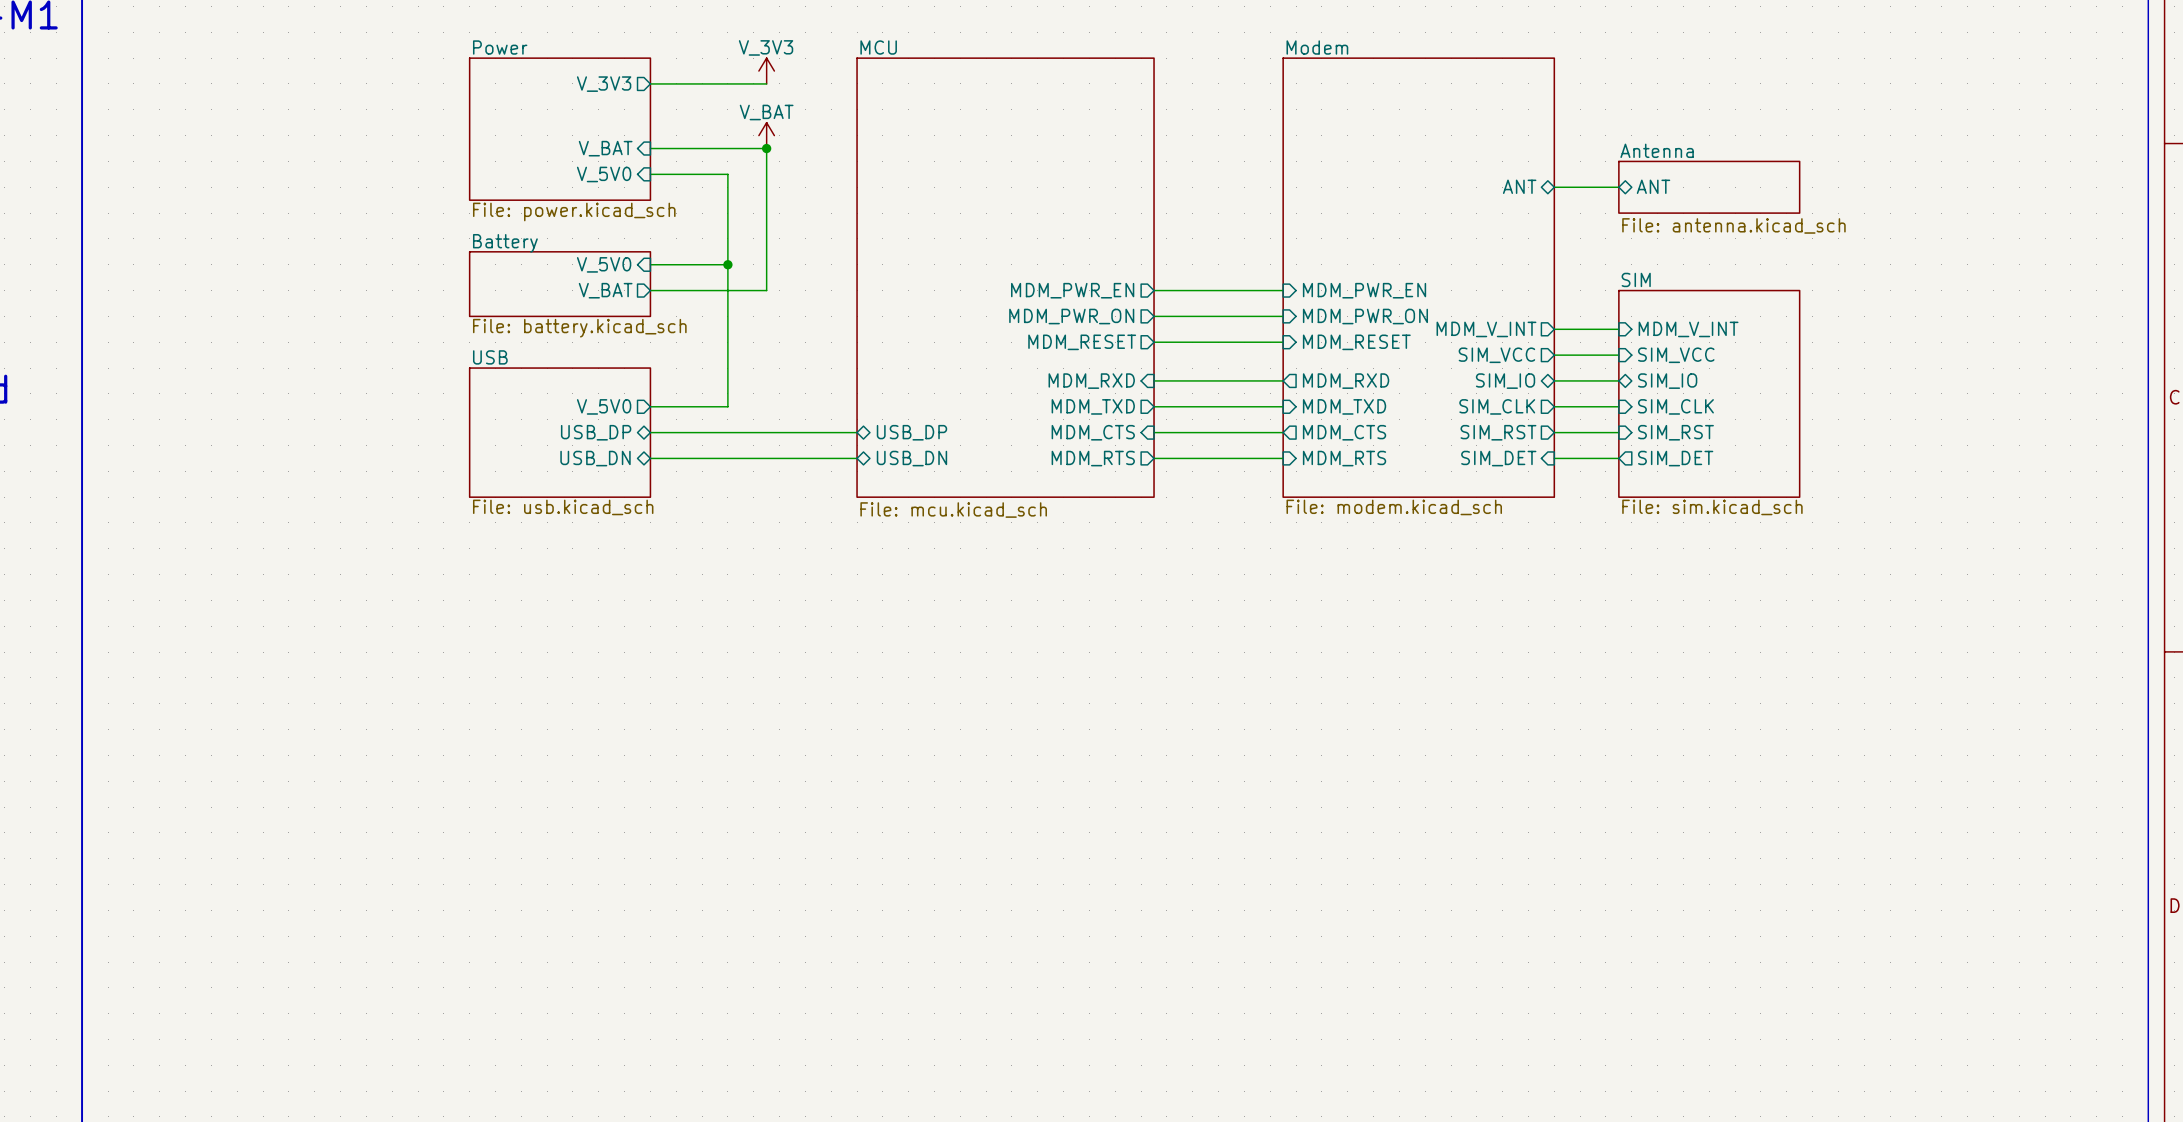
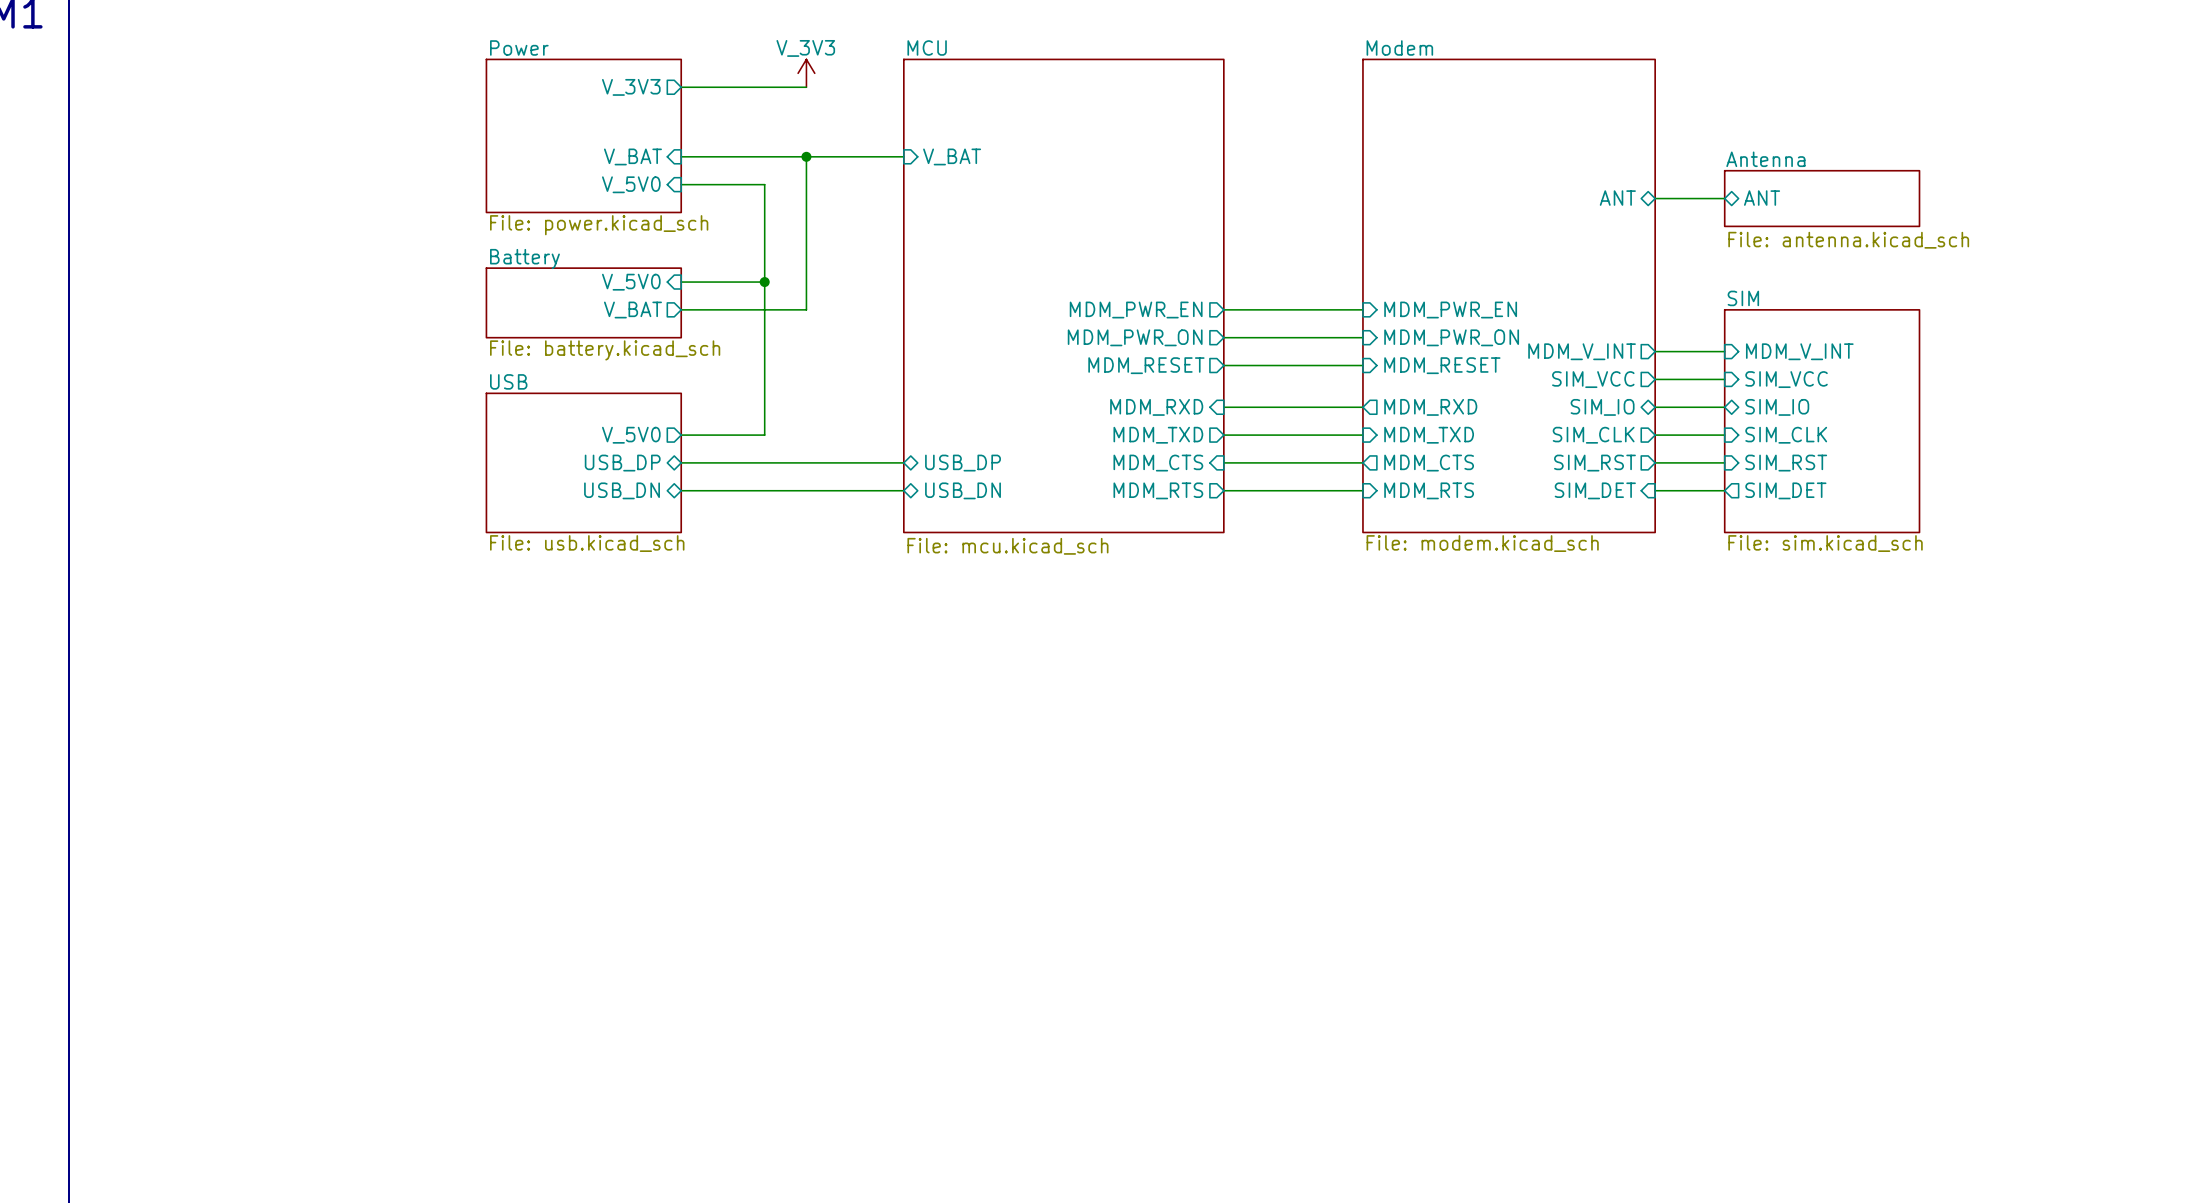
power symbol: V_BAT (766, 135) -> none
wire: none -> (806, 156) (903, 156)
sheet pin: none -> V_BAT (952, 156)

